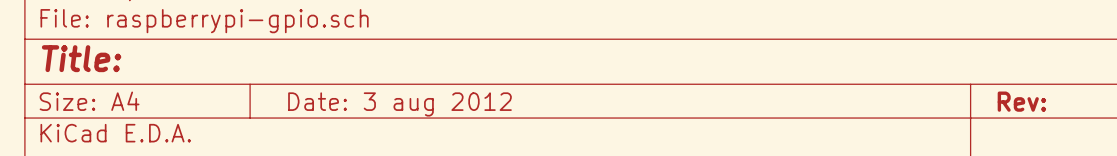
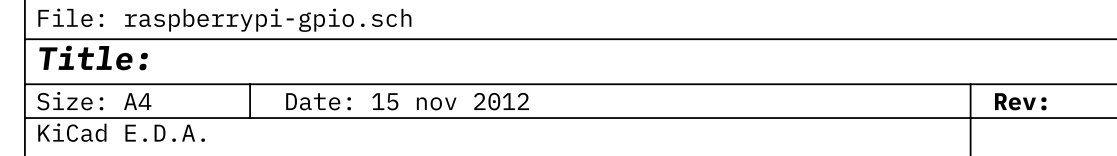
title block: Date: 3 aug 2012 (399, 104) -> Date: 15 nov 2012 (407, 101)

